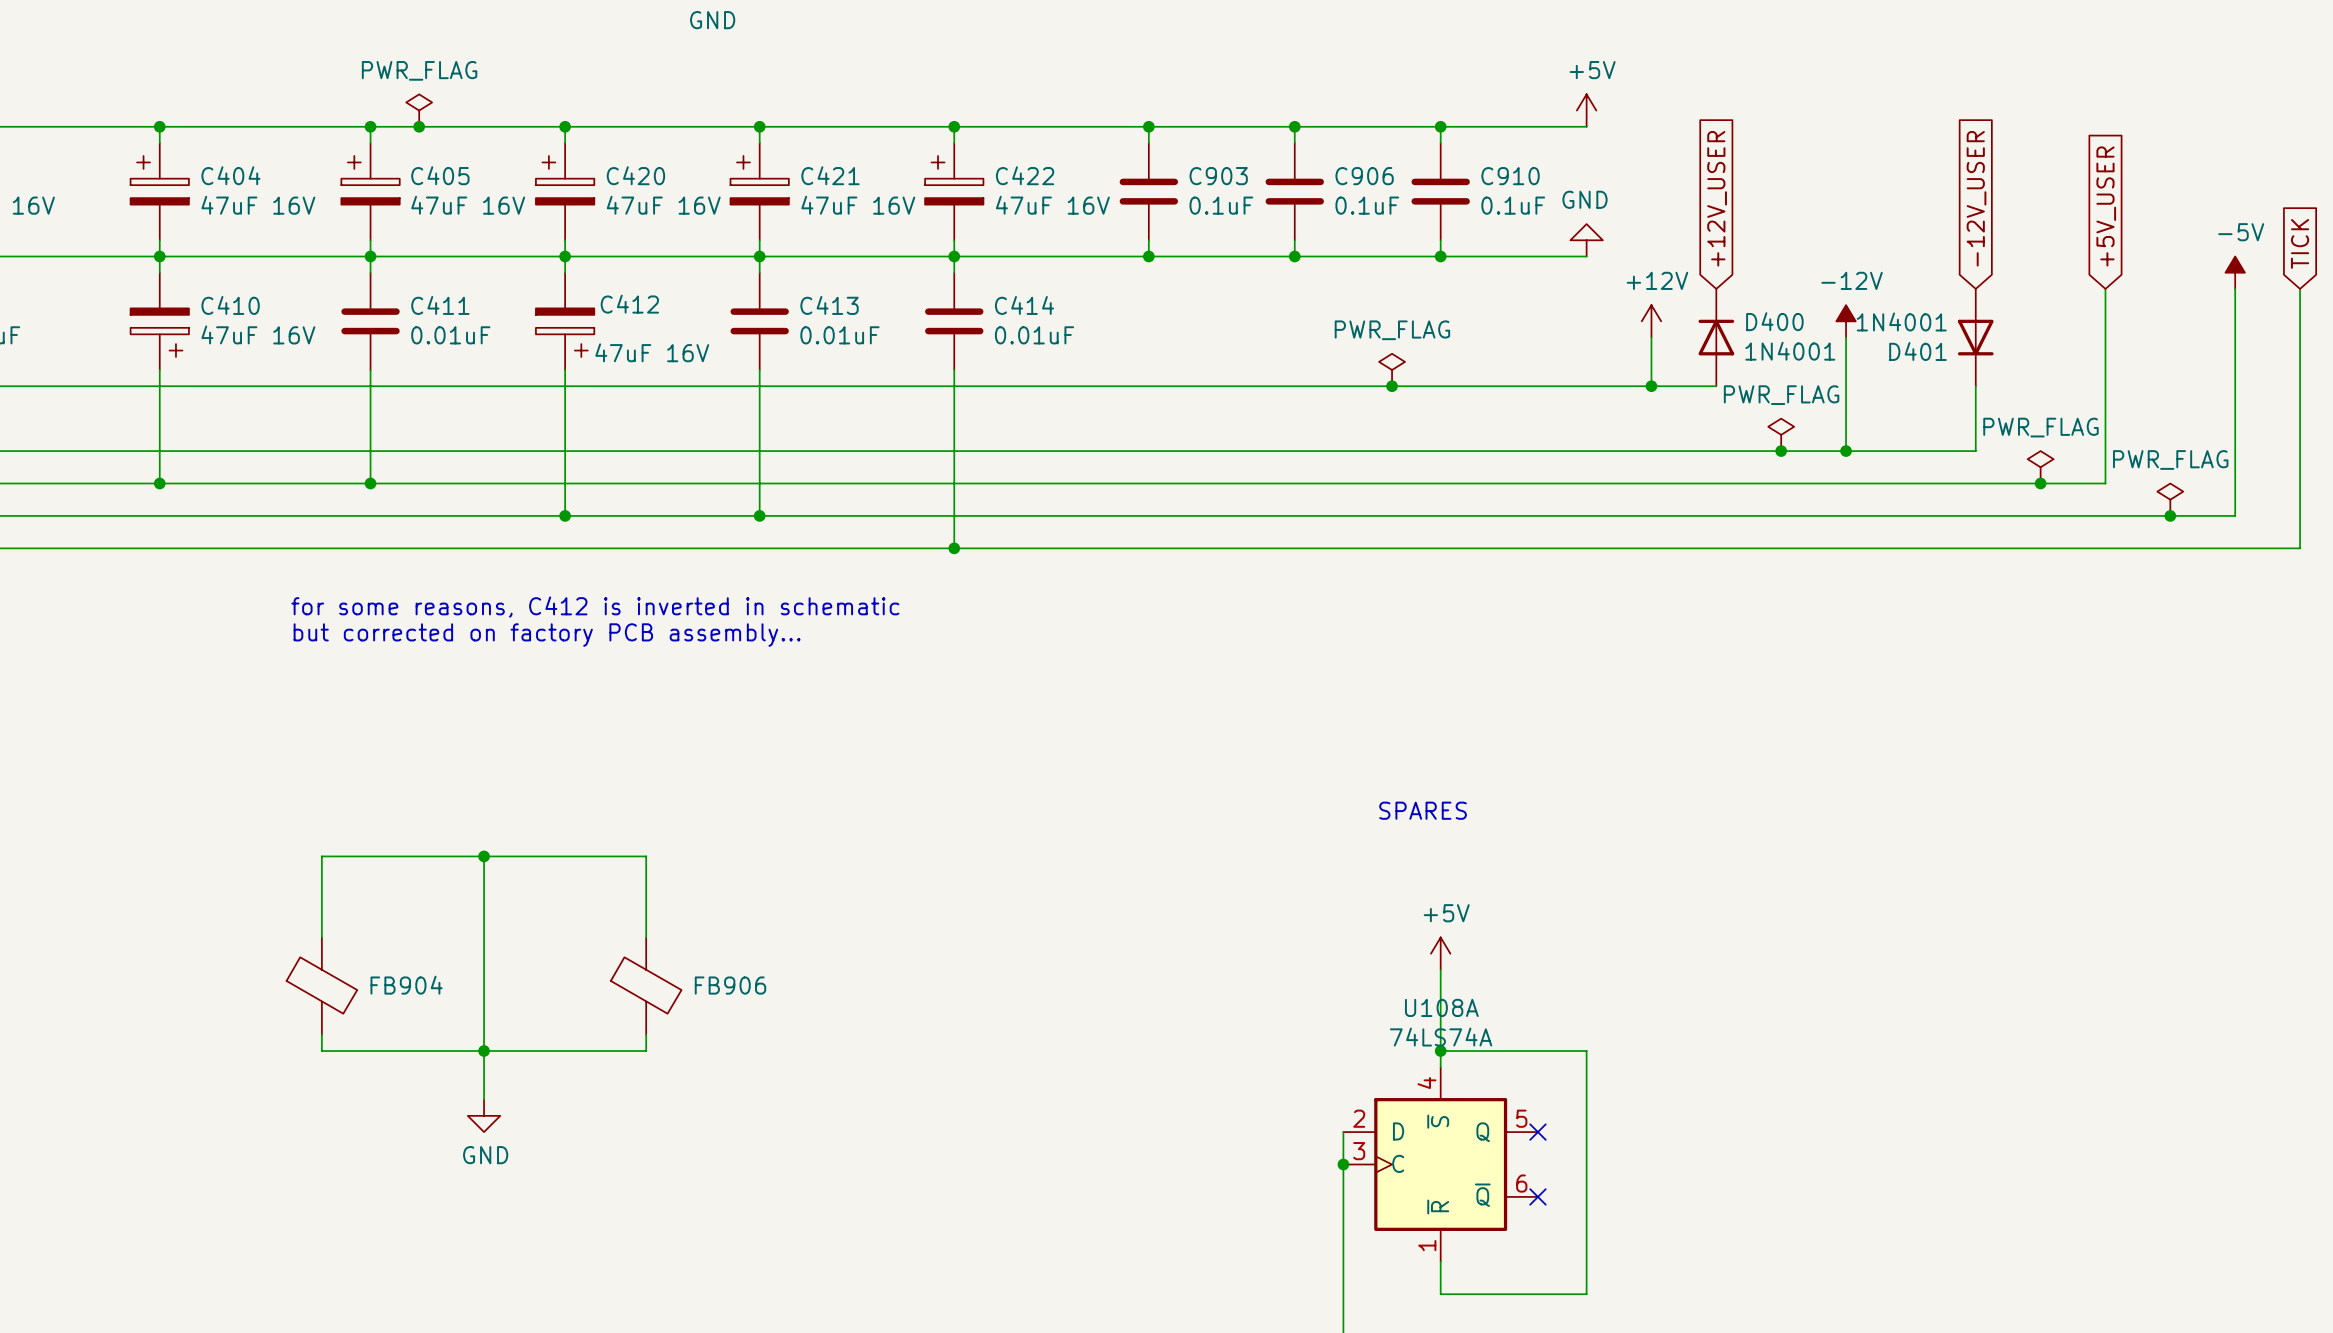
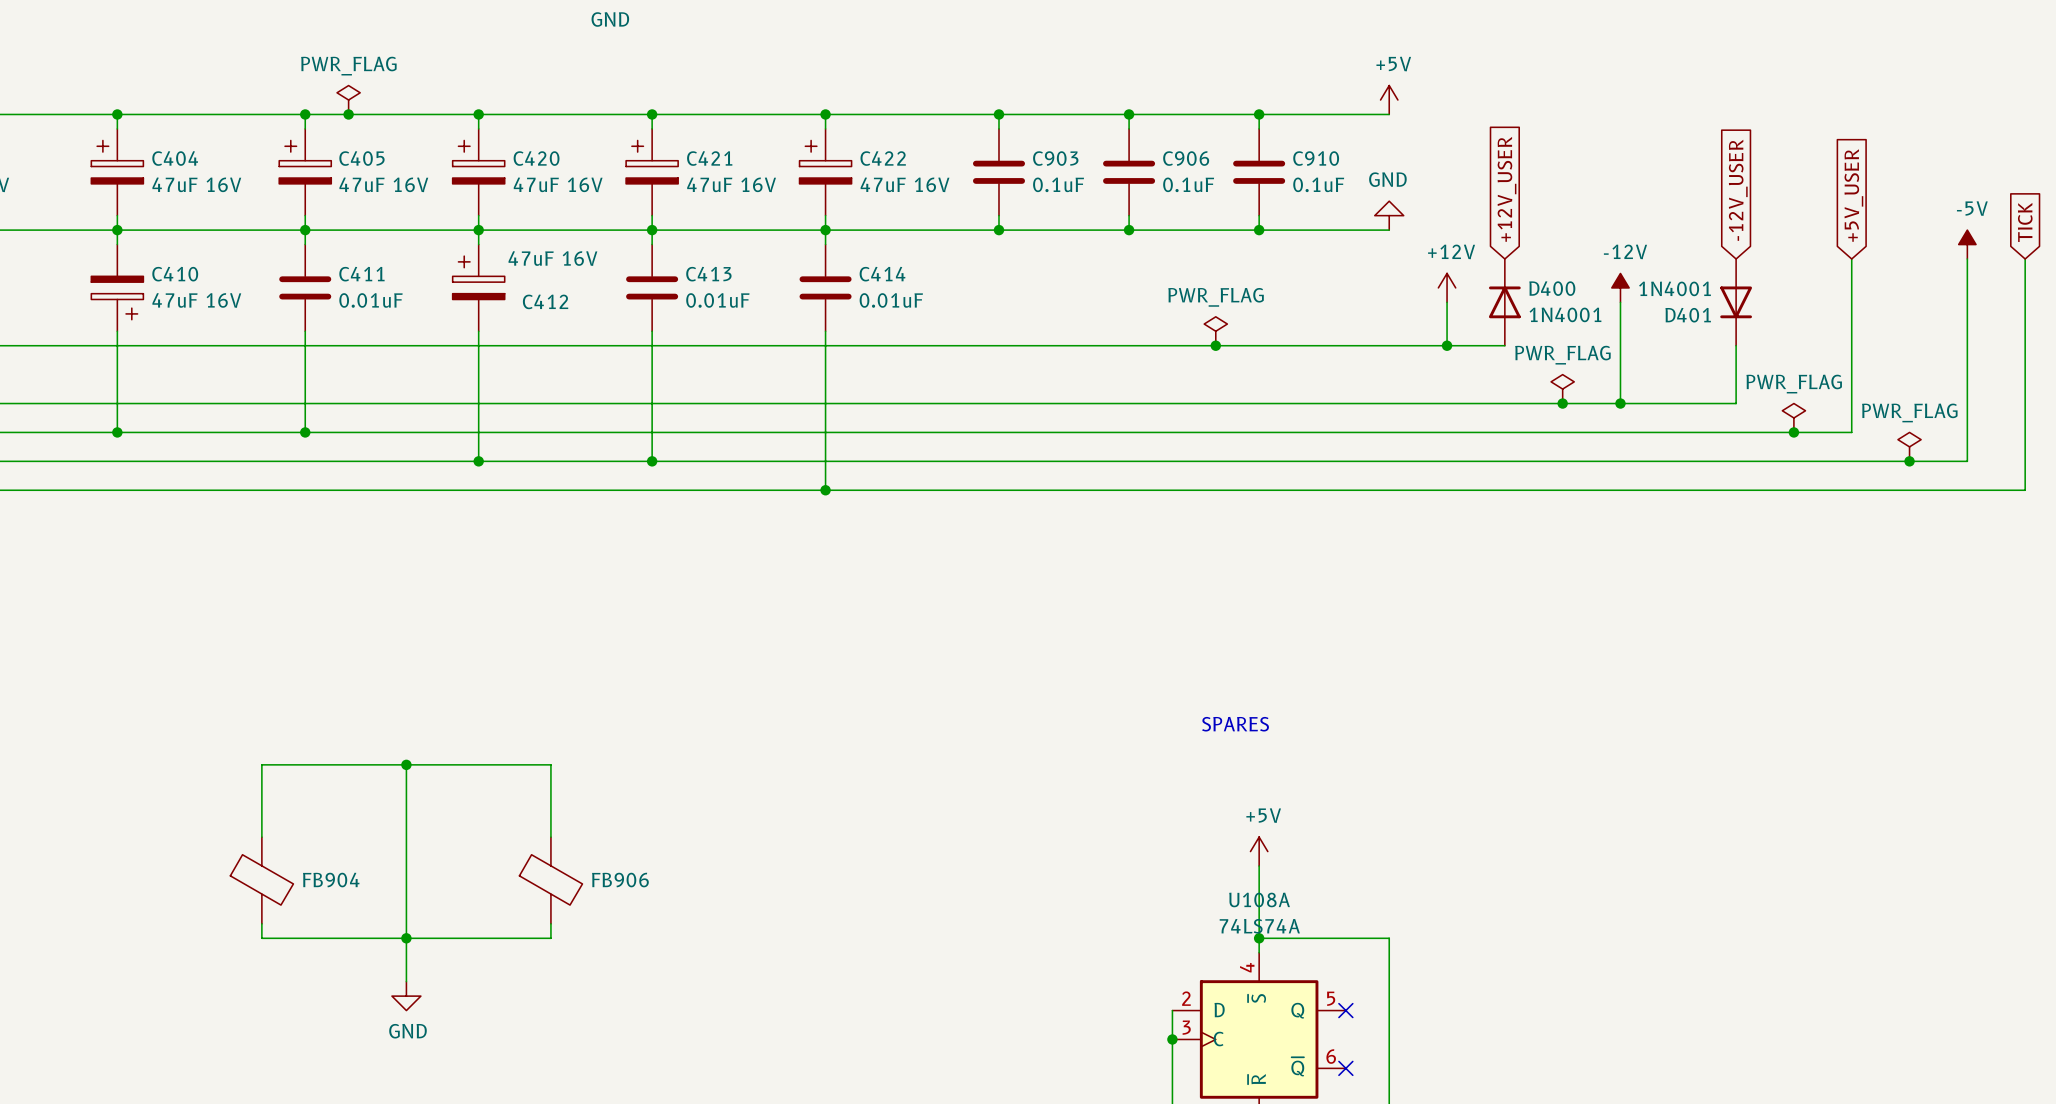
C412 name position: C412 (629, 304) -> C412 (545, 301)
C412 rotation: 0° (565, 332) -> 180° (478, 277)
C412 value position: 47uF 16V (652, 352) -> 47uF 16V (552, 258)
text: for some reasons, C412 is inverted in schematic (595, 607) -> none
text: but corrected on factory PCB assembly… (547, 635) -> none

